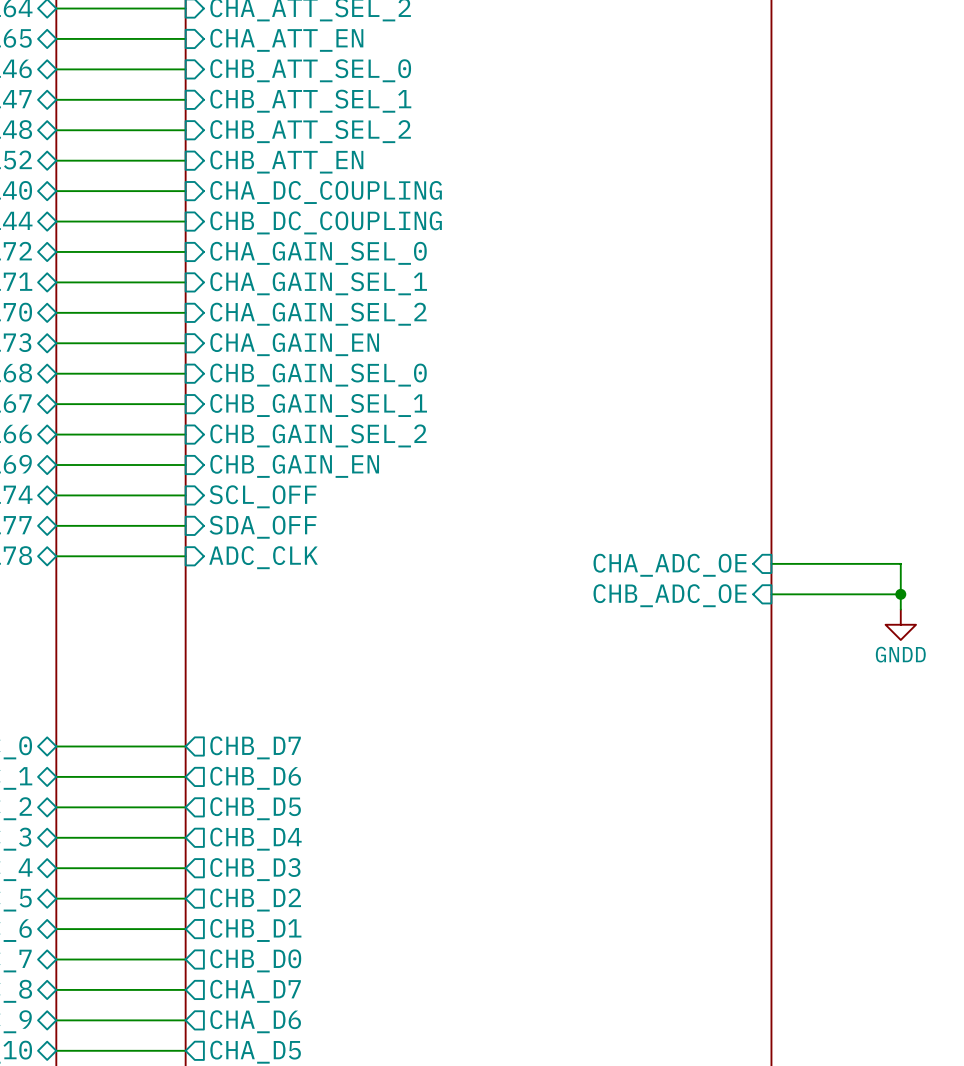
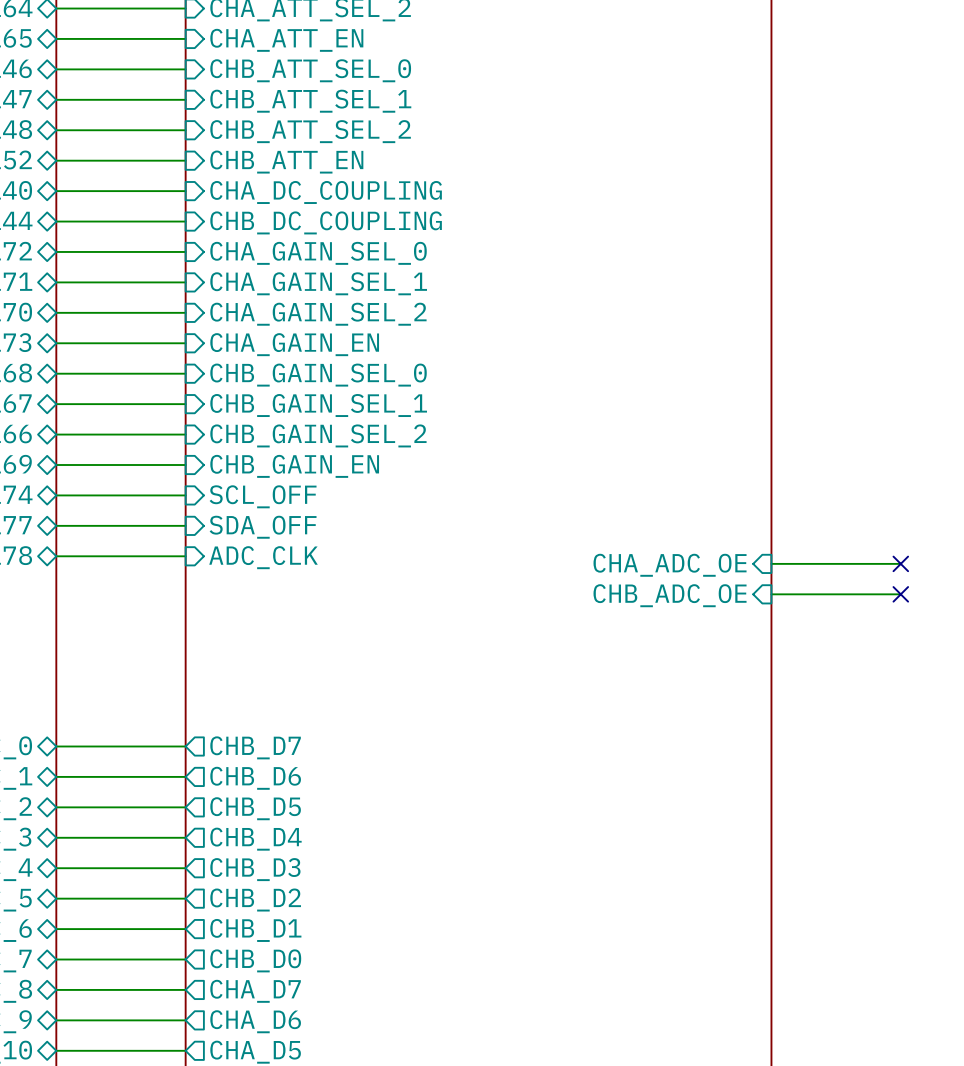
wire: (900, 563) (900, 609) -> none
no-connect mark: none -> (900, 563)
junction: (900, 594) -> none
no-connect mark: none -> (900, 594)
power symbol: GNDD (900, 624) -> none

